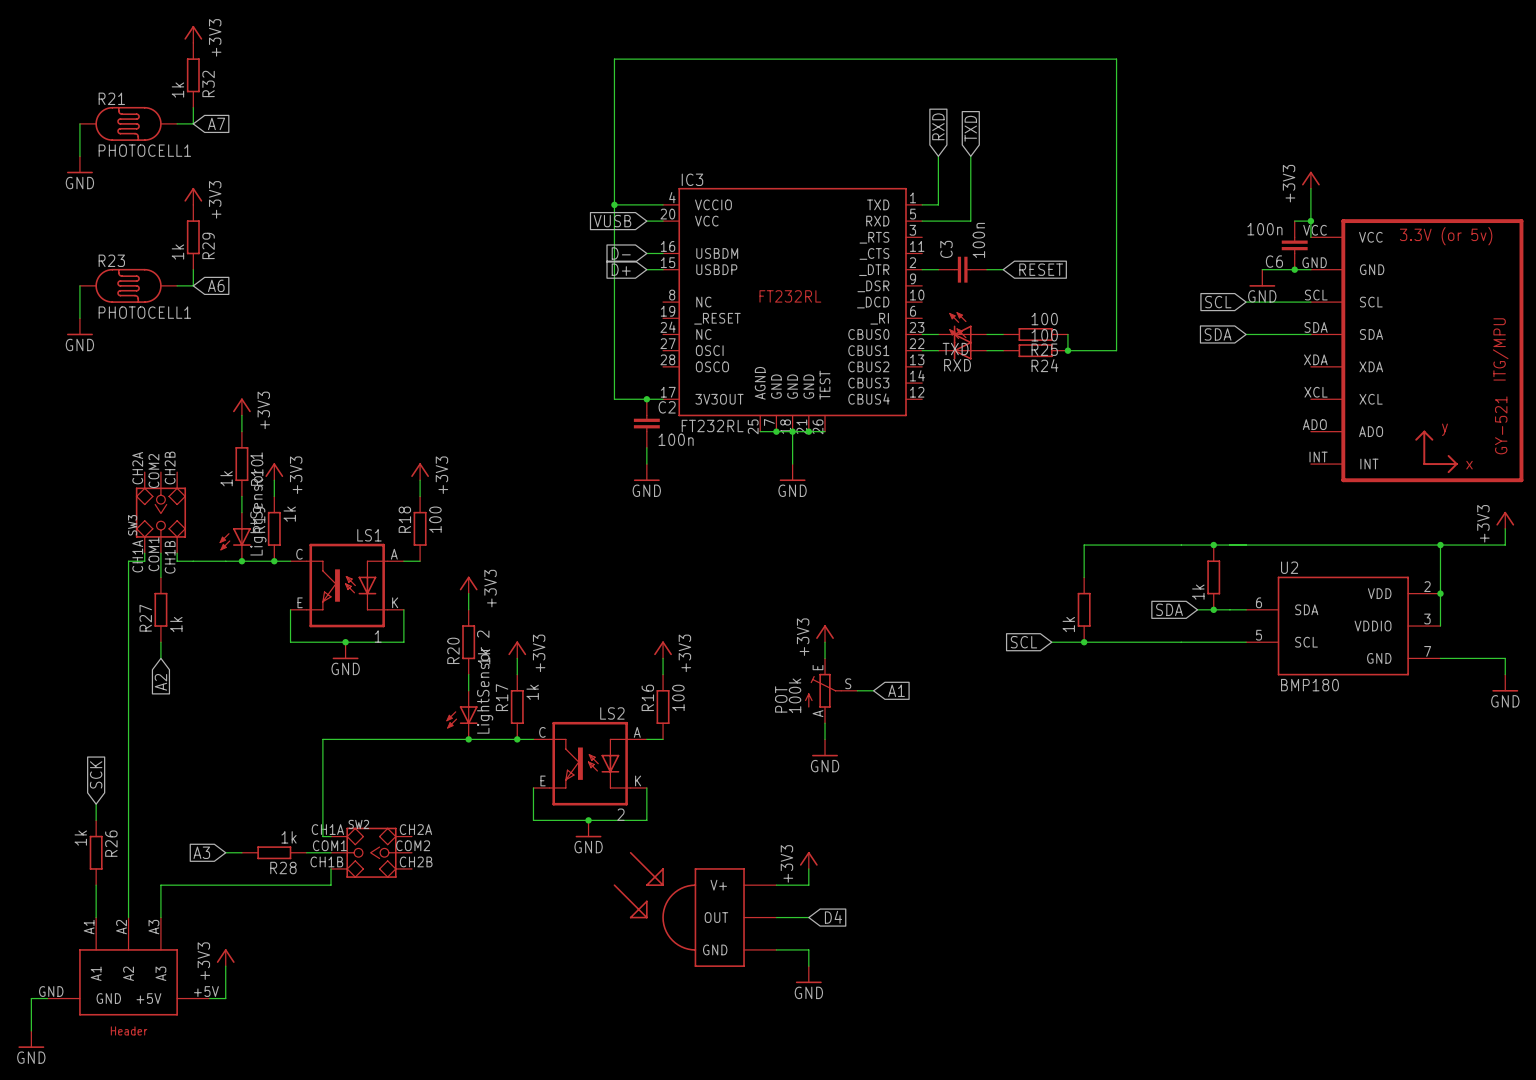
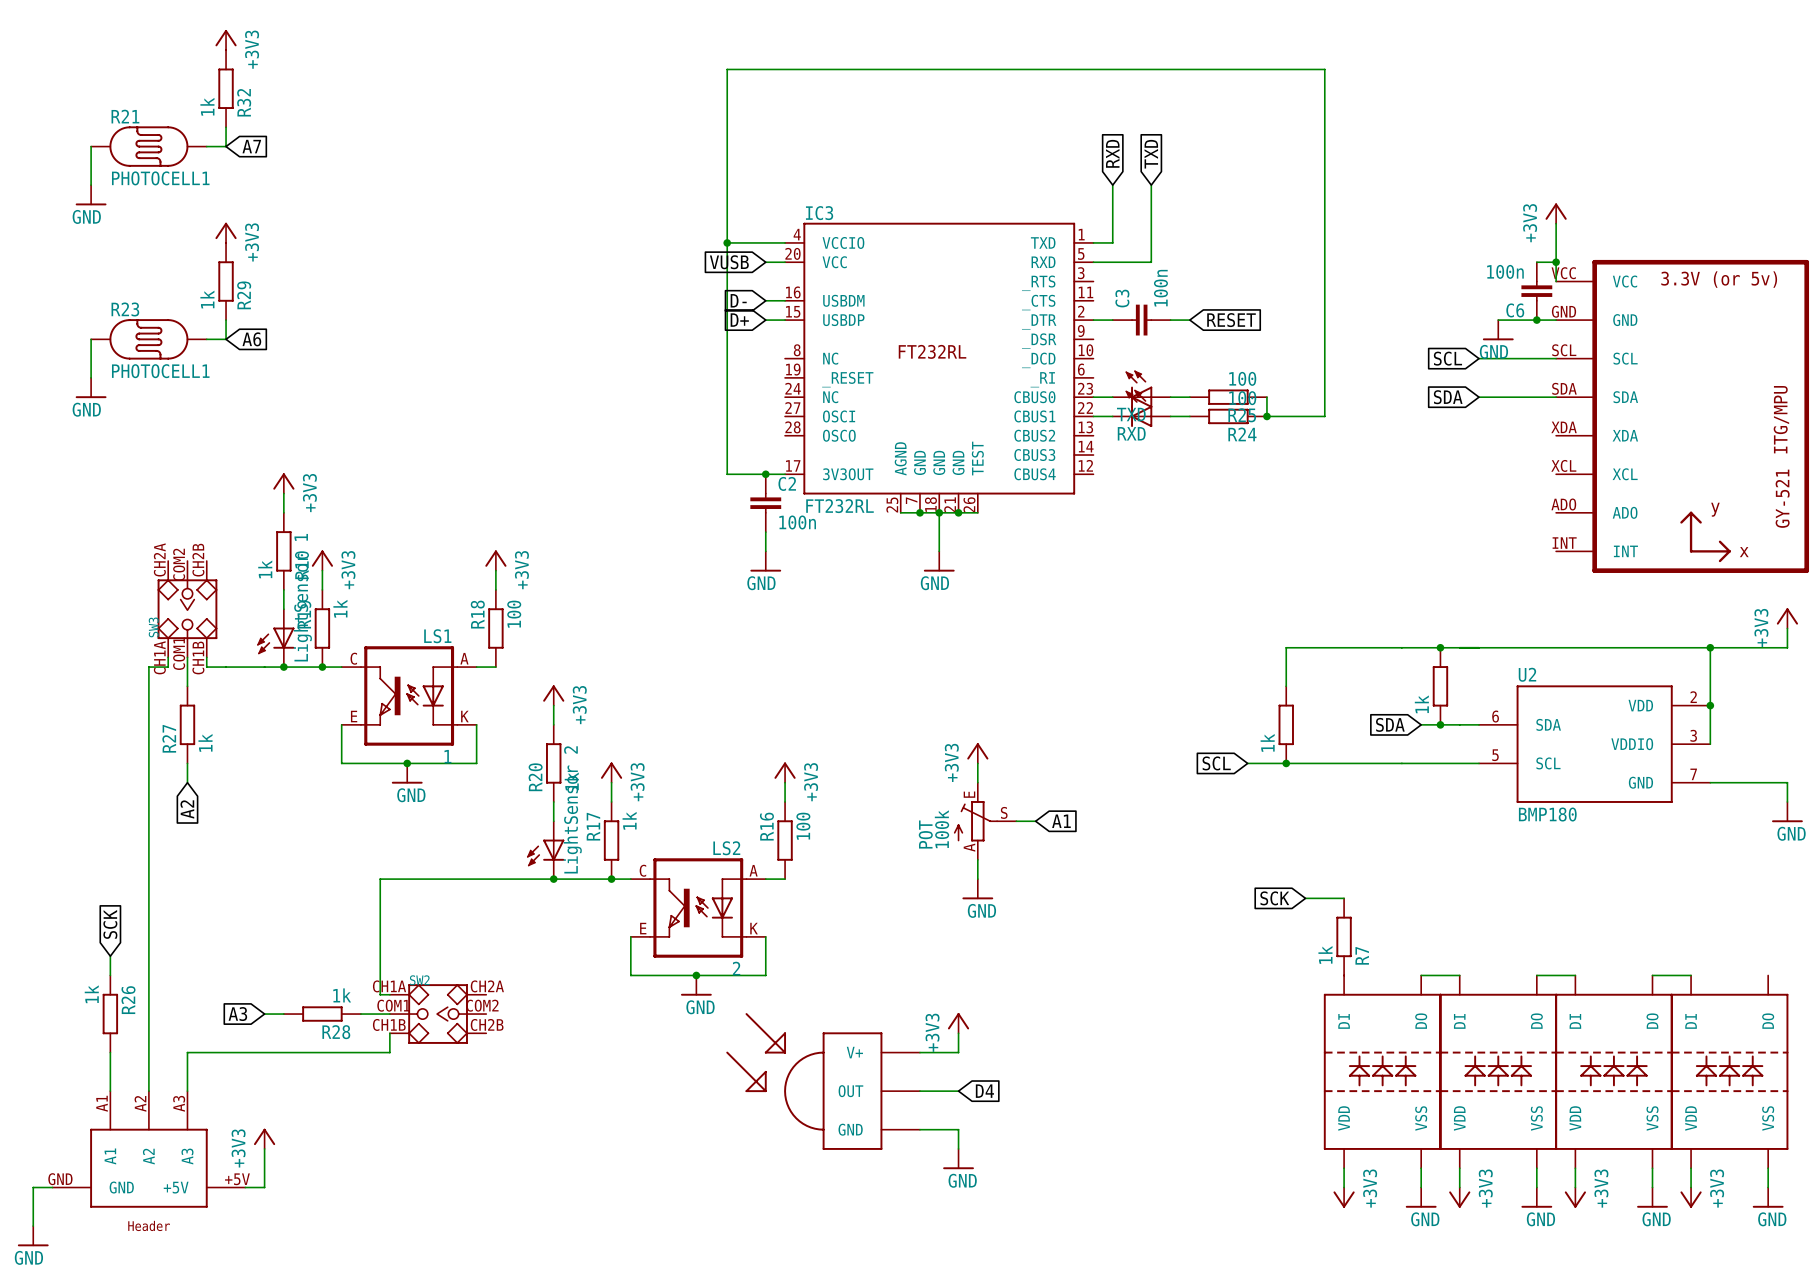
global label: none -> SCK (1274, 898)
wire: none -> (1305, 898) (1344, 898)
R7: none -> 1k (1344, 936)
wire: none -> (1421, 975) (1459, 975)
wire: none -> (1536, 975) (1575, 975)
wire: none -> (1652, 975) (1691, 975)
part: none -> (1382, 1071)
part: none -> (1498, 1071)
part: none -> (1613, 1071)
part: none -> (1729, 1071)
wire: none -> (1344, 1168) (1344, 1187)
wire: none -> (1421, 1168) (1421, 1187)
wire: none -> (1459, 1168) (1459, 1187)
wire: none -> (1536, 1168) (1536, 1187)
wire: none -> (1575, 1168) (1575, 1187)
wire: none -> (1652, 1168) (1652, 1187)
wire: none -> (1691, 1168) (1691, 1187)
wire: none -> (1768, 1168) (1768, 1187)
power symbol: none -> +3V3 (1344, 1197)
power symbol: none -> GND (1421, 1197)
power symbol: none -> +3V3 (1459, 1197)
power symbol: none -> GND (1536, 1197)
power symbol: none -> +3V3 (1575, 1197)
power symbol: none -> GND (1652, 1197)
power symbol: none -> +3V3 (1691, 1197)
power symbol: none -> GND (1768, 1197)

